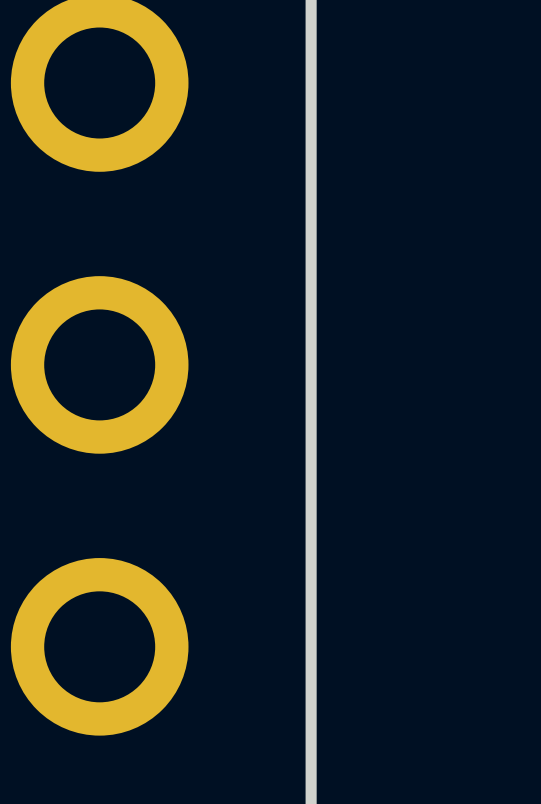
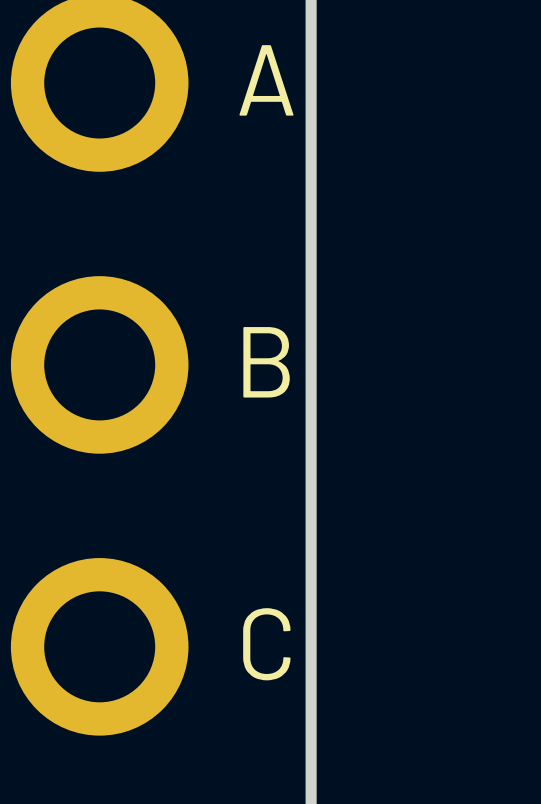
text: none -> A (266, 80)
text: none -> B (266, 362)
text: none -> C (266, 644)

